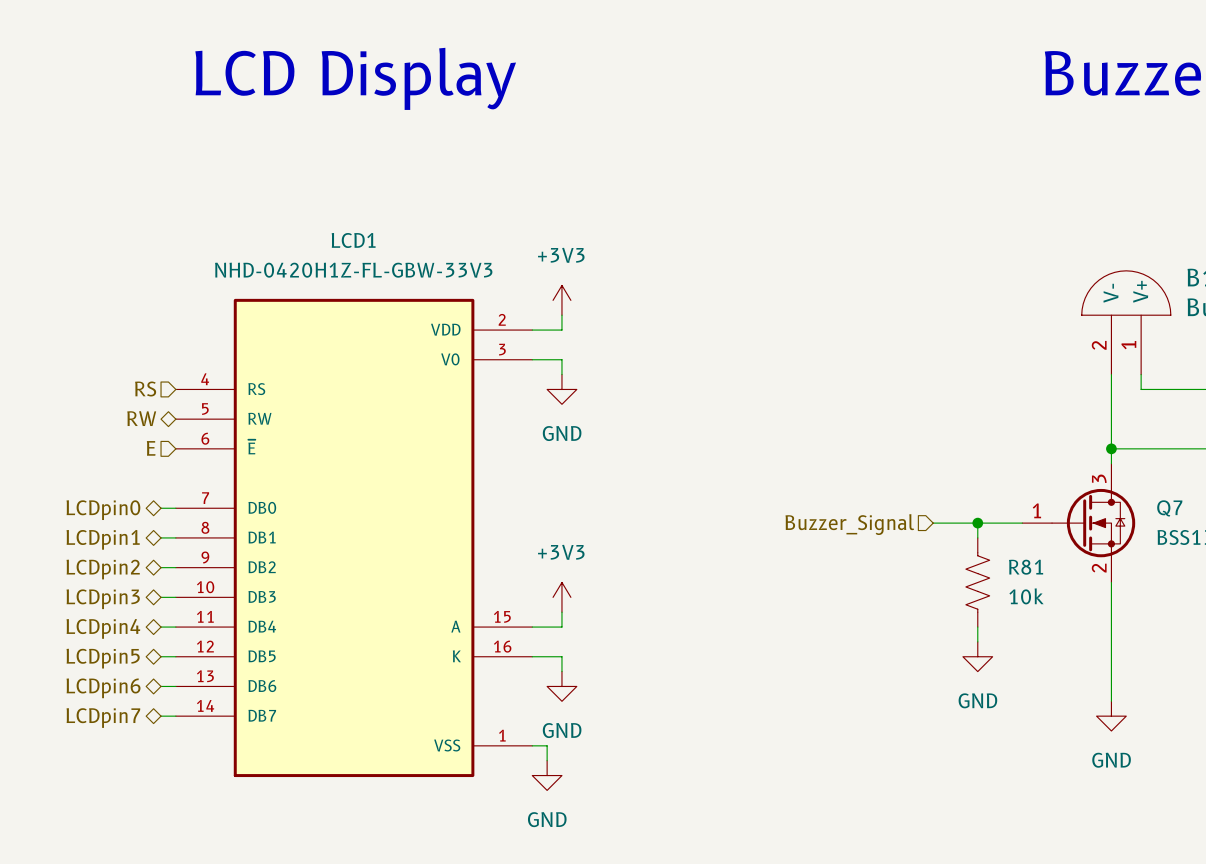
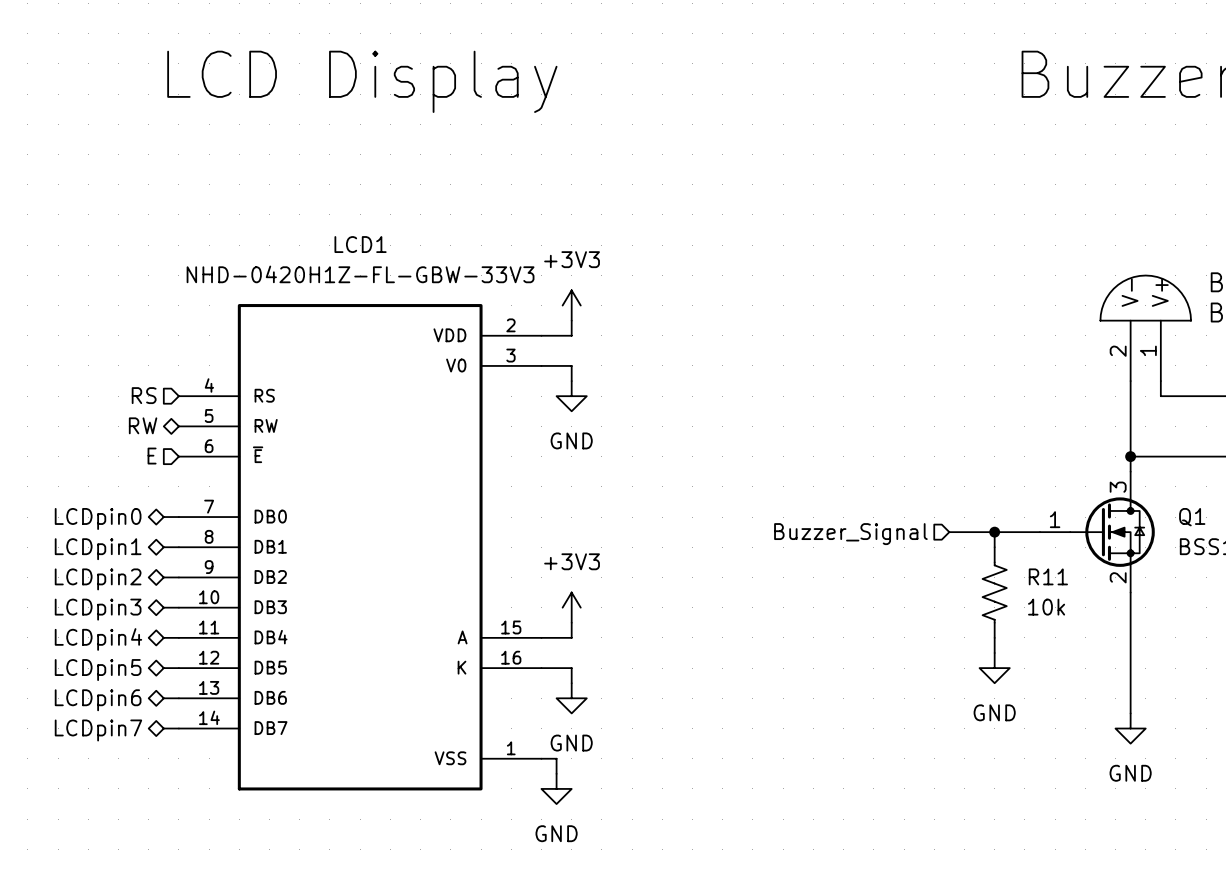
Q7 name: Q7 (1169, 508) -> Q1 (1192, 517)
R81 name: R81 (1026, 567) -> R11 (1048, 576)

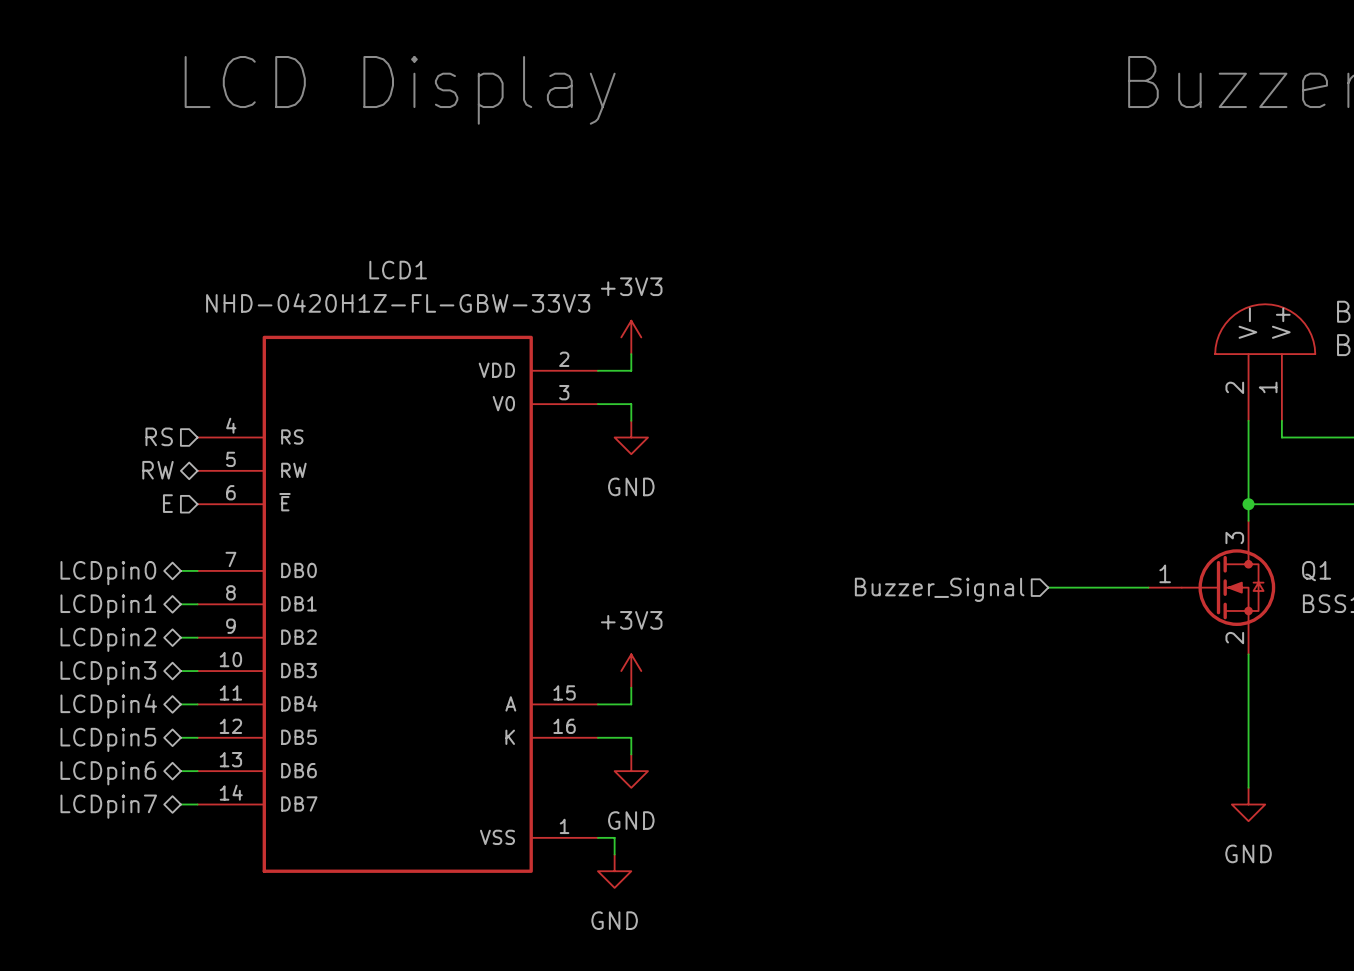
wire: (994, 532) (994, 547) -> none
junction: (994, 532) -> none
R11: 10k (994, 592) -> none
wire: (994, 637) (994, 652) -> none
power symbol: GND (994, 668) -> none

